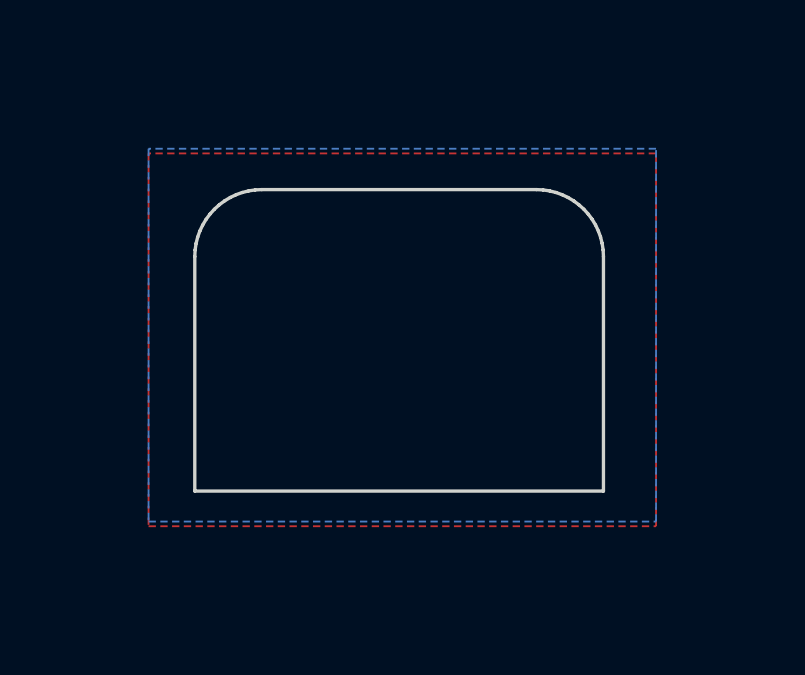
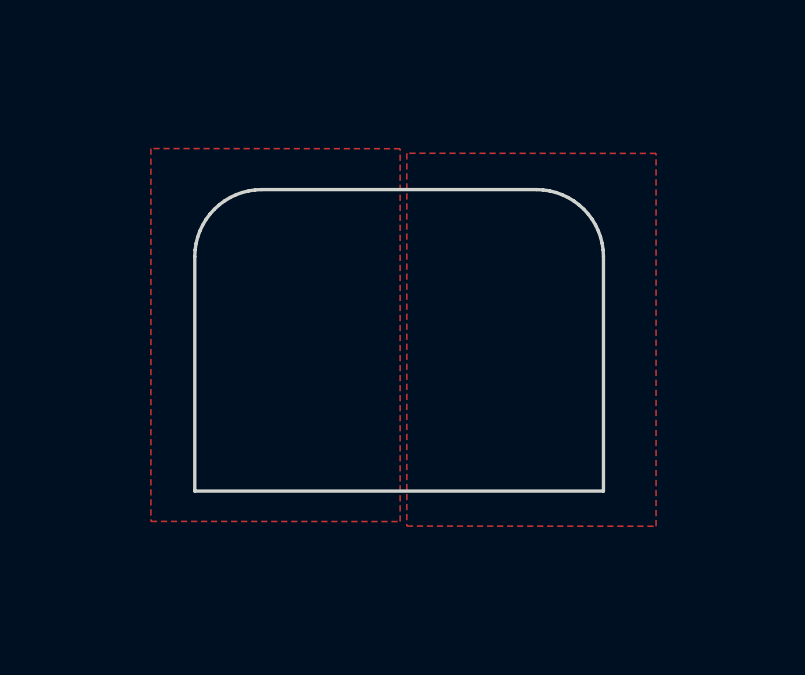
top zone outline: none -> (150, 148) (400, 148) (400, 521) (150, 521) (150, 148)
bottom zone outline: (656, 148) (656, 521) (148, 521) (148, 148) (656, 148) -> none
top zone outline: (656, 153) (148, 153) (148, 526) (656, 526) -> (656, 153) (406, 153) (406, 526) (656, 526)

